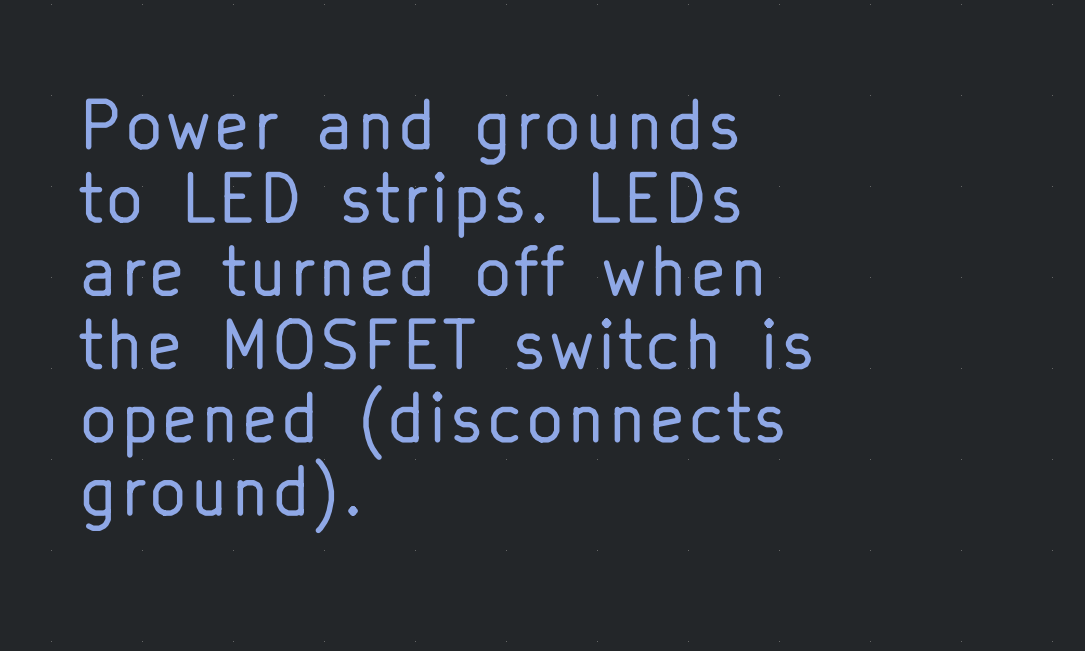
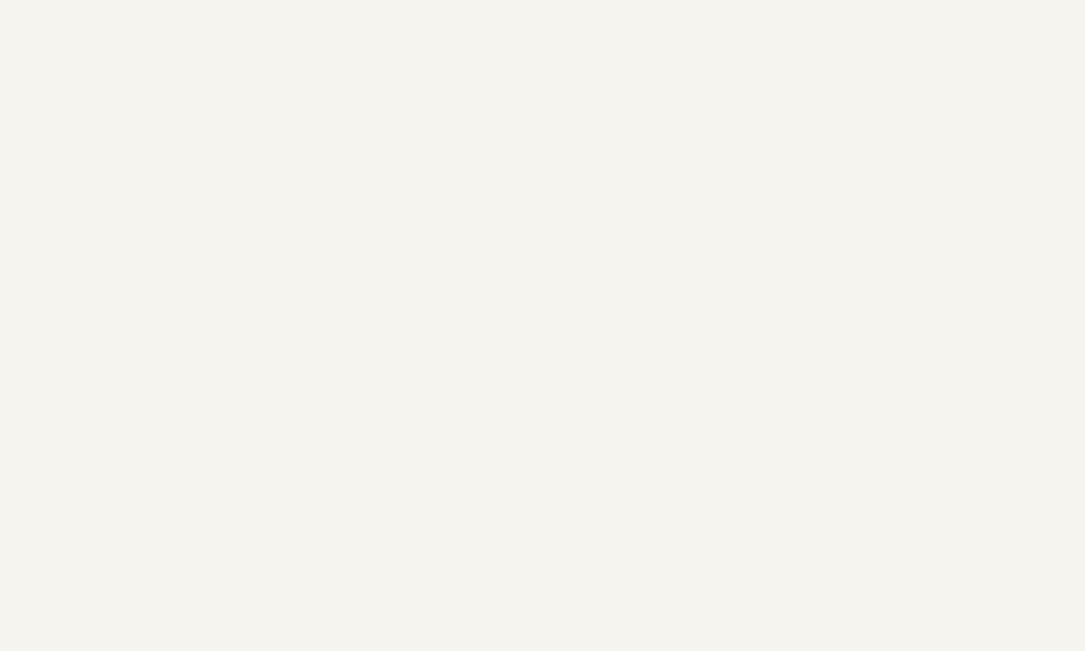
text: Power and grounds (411, 131) -> none
text: to LED strips. LEDs (409, 204) -> none
text: are turned off when (422, 270) -> none
text: the MOSFET switch is (445, 343) -> none
text: opened (disconnects (433, 422) -> none
text: ground). (220, 495) -> none

